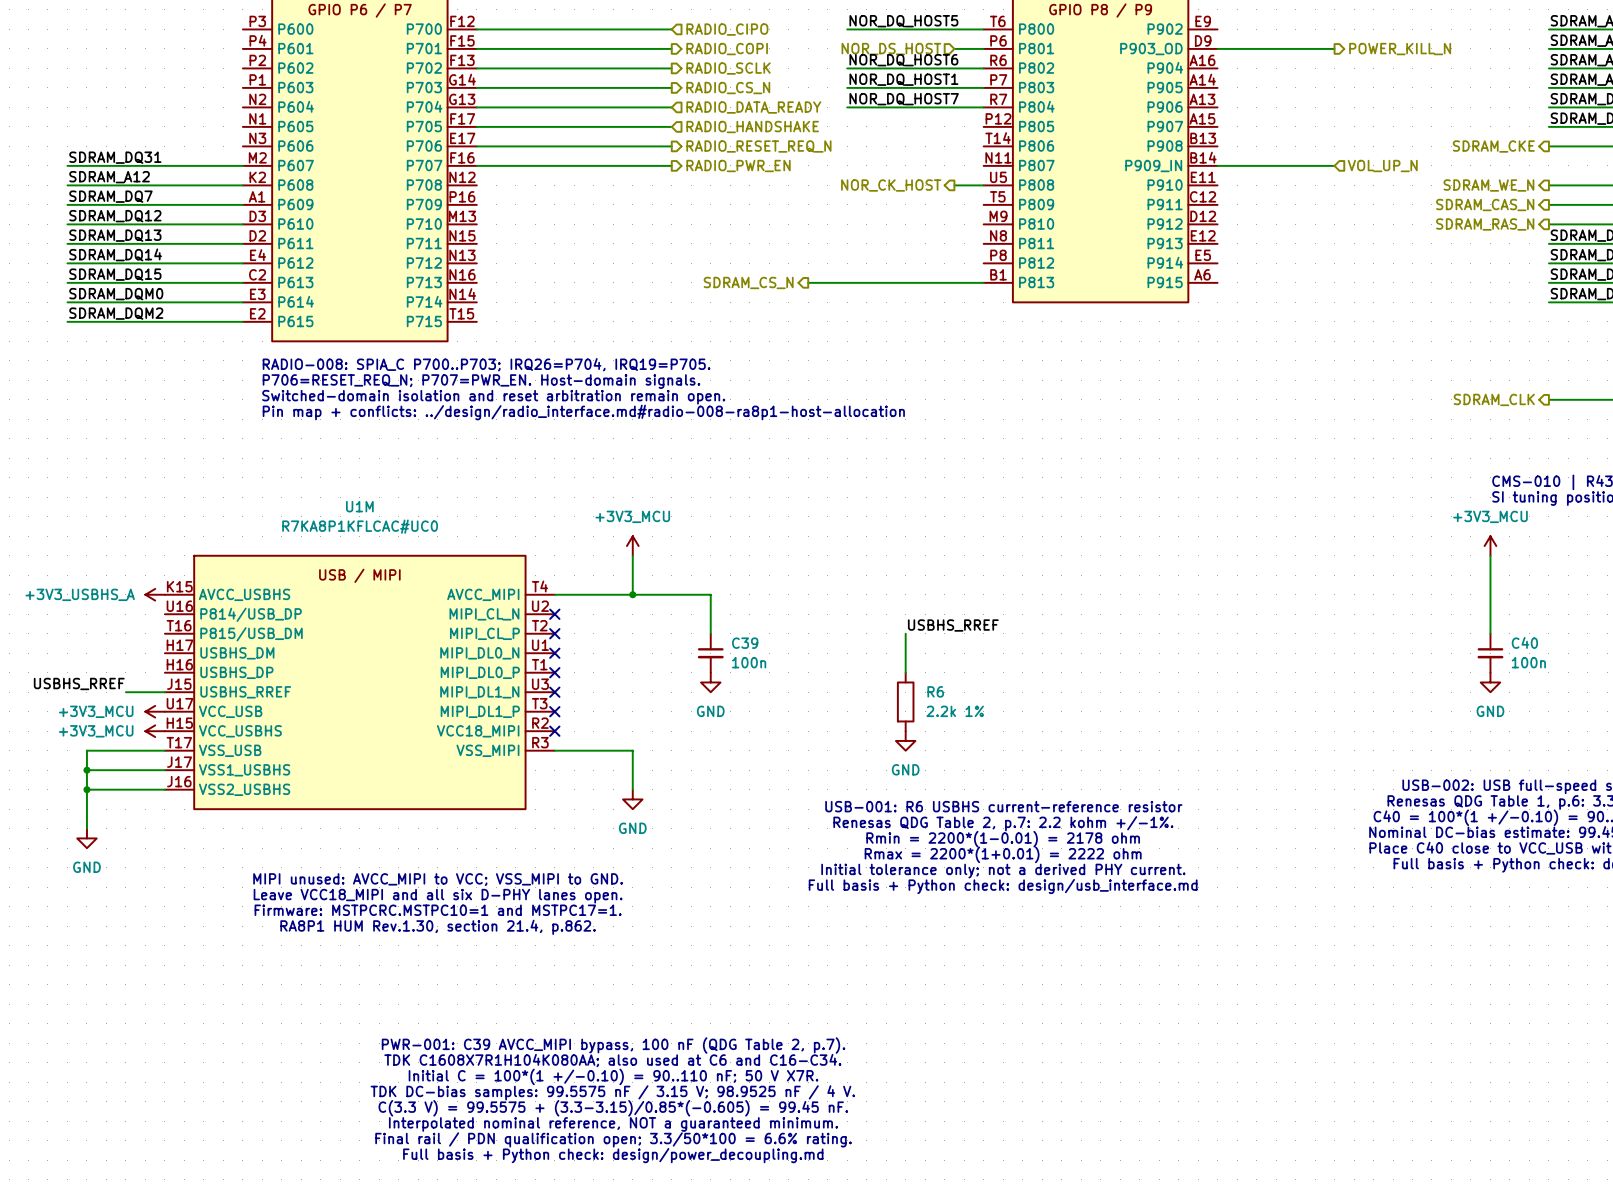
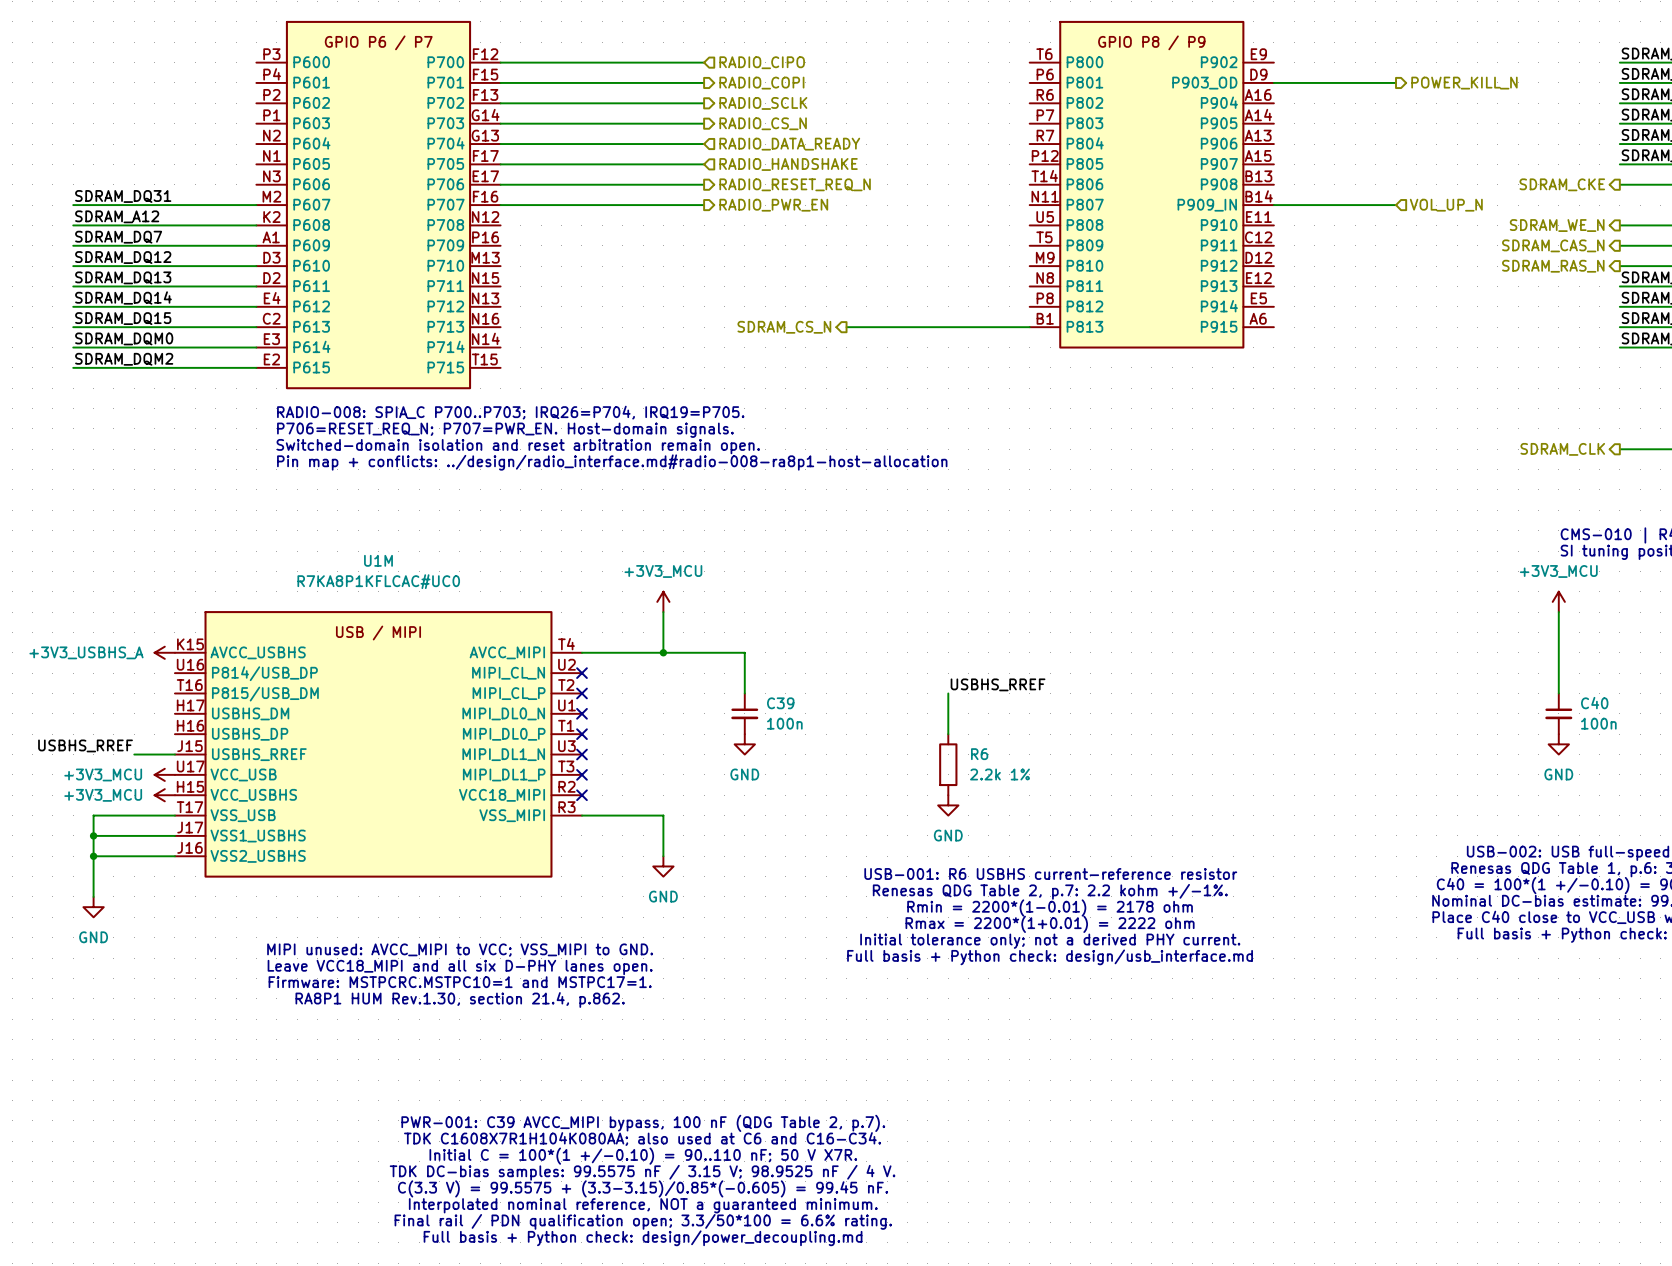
label: NOR_DQ_HOST5 (903, 21) -> none
wire: (847, 29) (983, 29) -> none
wire: (954, 48) (983, 48) -> none
hierarchical label: NOR_DS_HOST (891, 49) -> none
label: NOR_DQ_HOST6 (903, 60) -> none
wire: (847, 68) (983, 68) -> none
label: NOR_DQ_HOST1 (903, 79) -> none
wire: (847, 87) (983, 87) -> none
label: NOR_DQ_HOST7 (904, 99) -> none
wire: (847, 107) (983, 107) -> none
hierarchical label: NOR_CK_HOST (891, 185) -> none
wire: (954, 185) (983, 185) -> none

